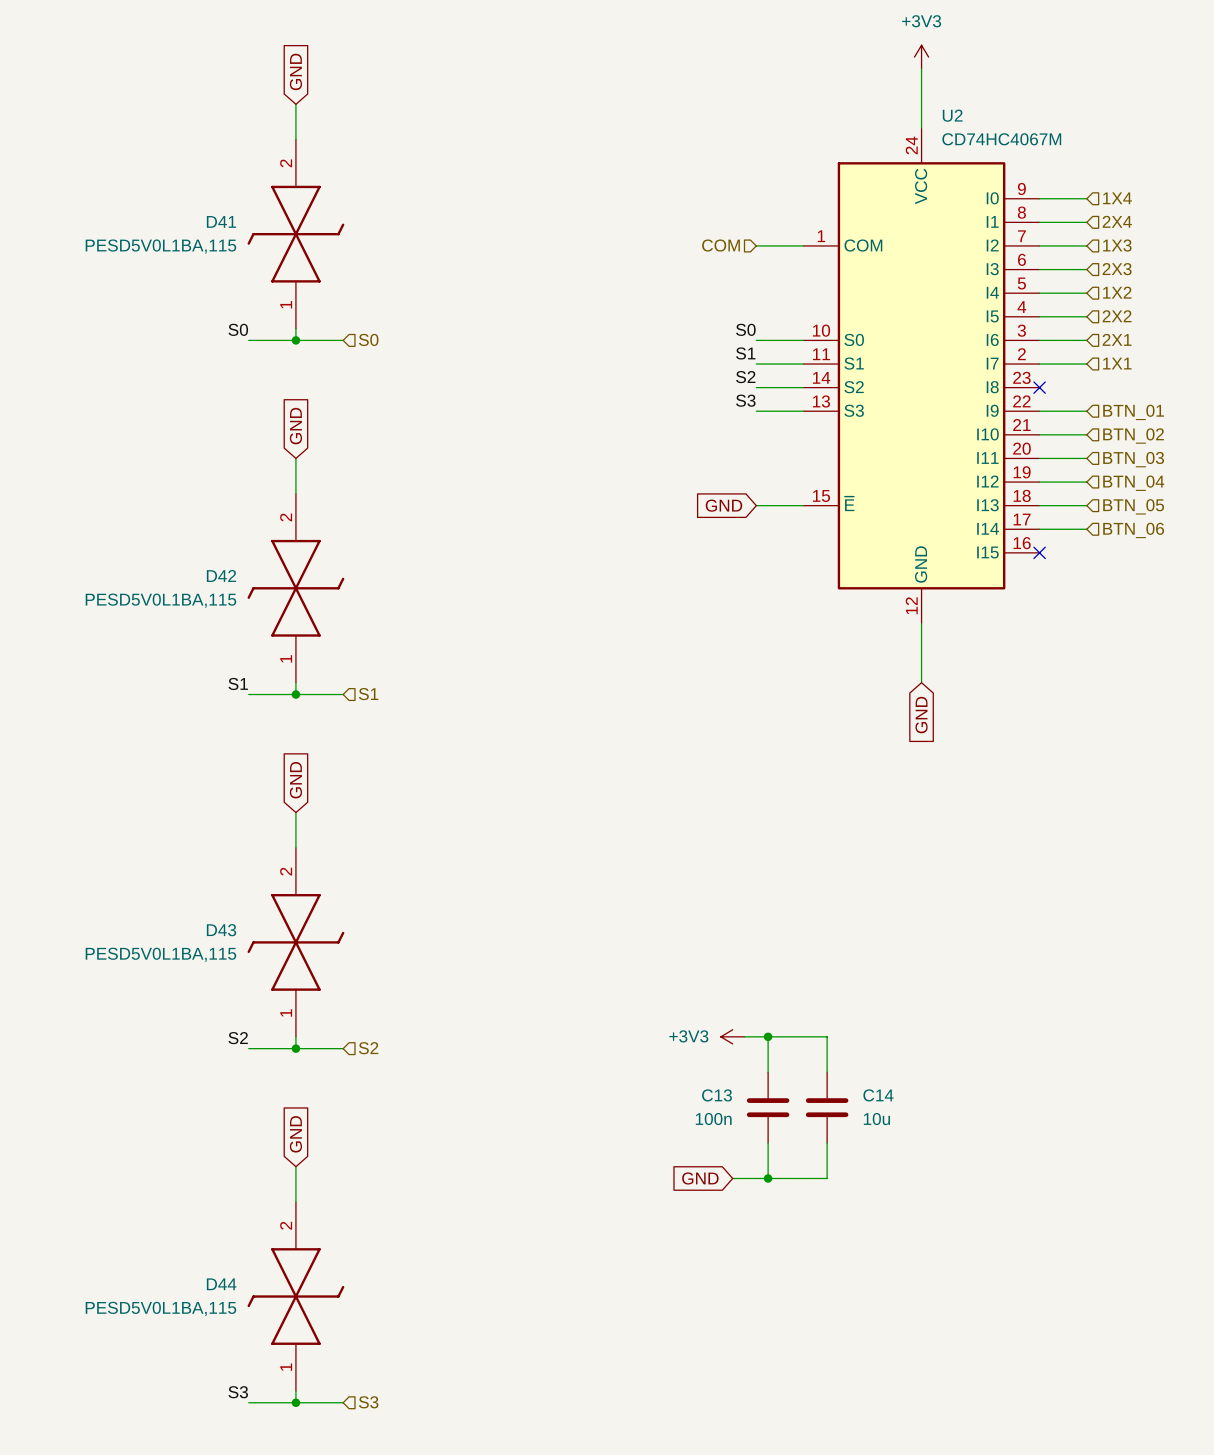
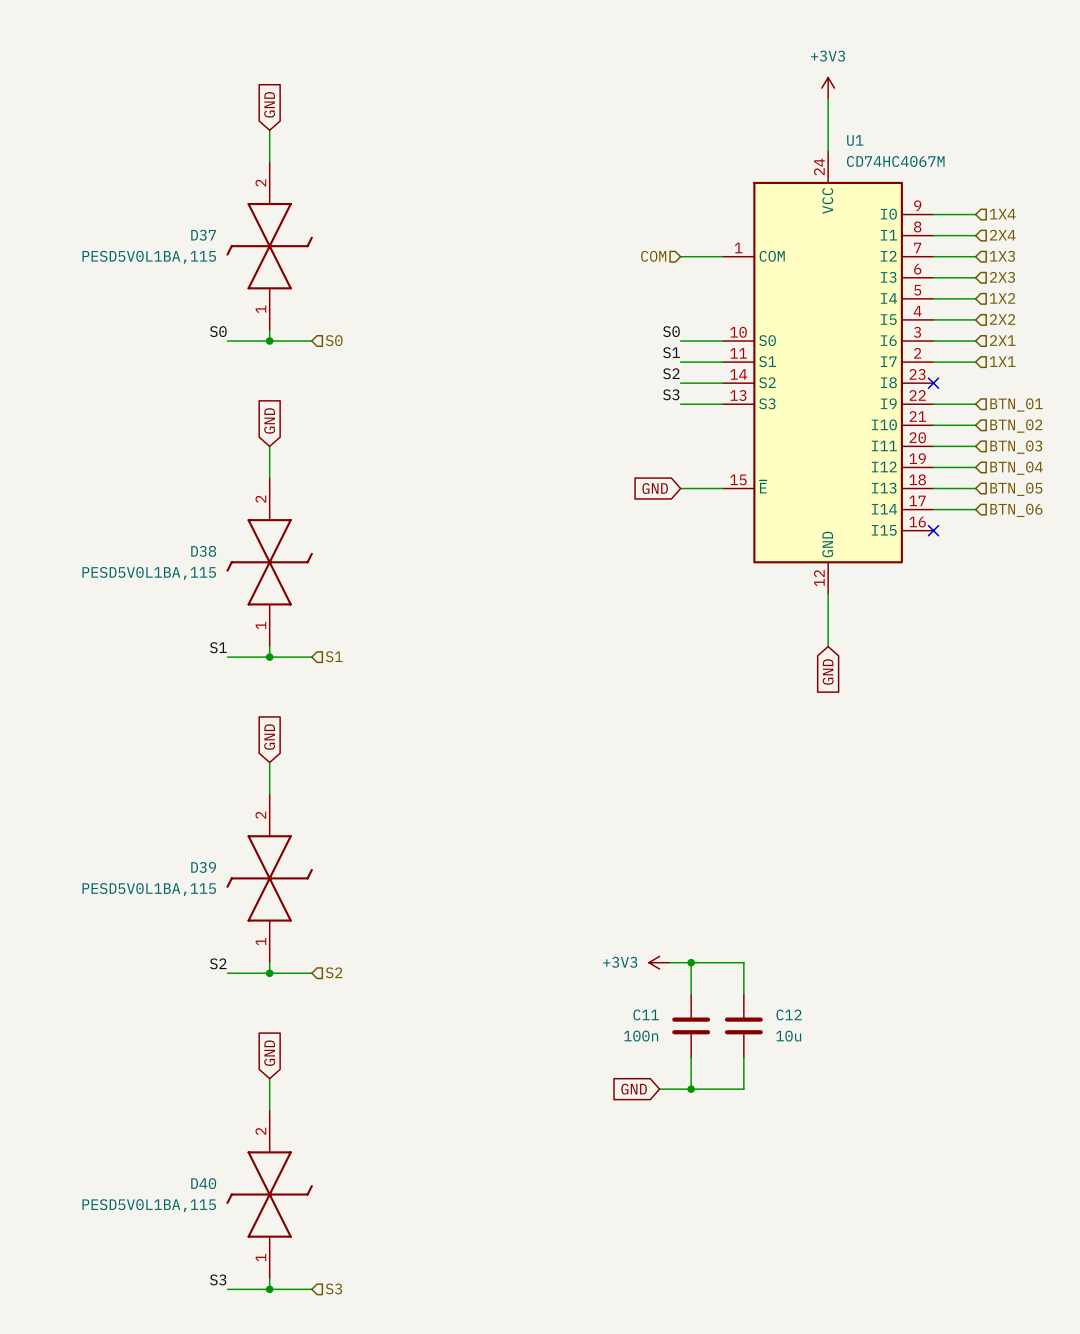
U2 name: U2 (952, 115) -> U1 (855, 140)
D41 name: D41 (221, 221) -> D37 (203, 235)
D42 name: D42 (221, 575) -> D38 (203, 551)
D43 name: D43 (221, 930) -> D39 (203, 867)
C13 name: C13 (717, 1095) -> C11 (646, 1014)
C14 name: C14 (878, 1095) -> C12 (789, 1014)
D44 name: D44 (221, 1284) -> D40 (203, 1183)

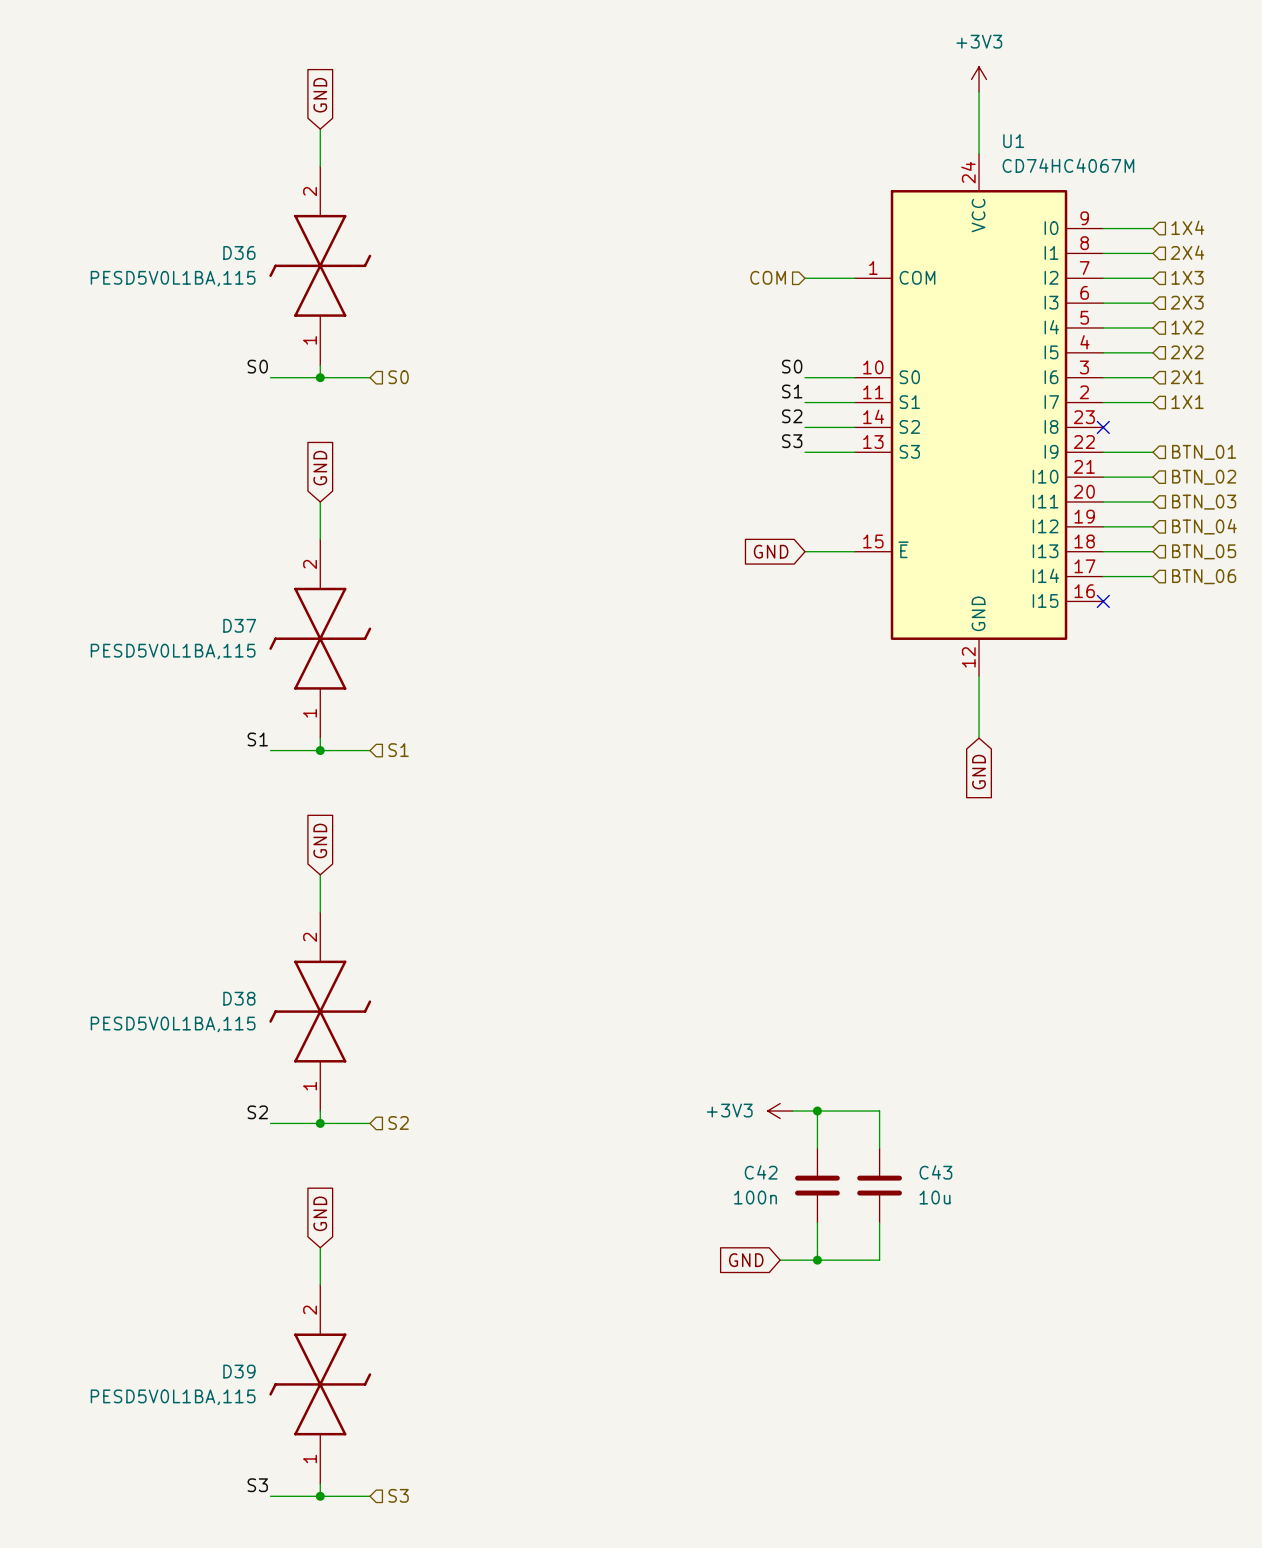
D37 name: D37 (203, 235) -> D36 (239, 252)
D38 name: D38 (203, 551) -> D37 (239, 625)
D39 name: D39 (203, 867) -> D38 (239, 998)
C11 name: C11 (646, 1014) -> C42 (761, 1172)
C12 name: C12 (789, 1014) -> C43 (935, 1172)
D40 name: D40 (203, 1183) -> D39 (239, 1371)

